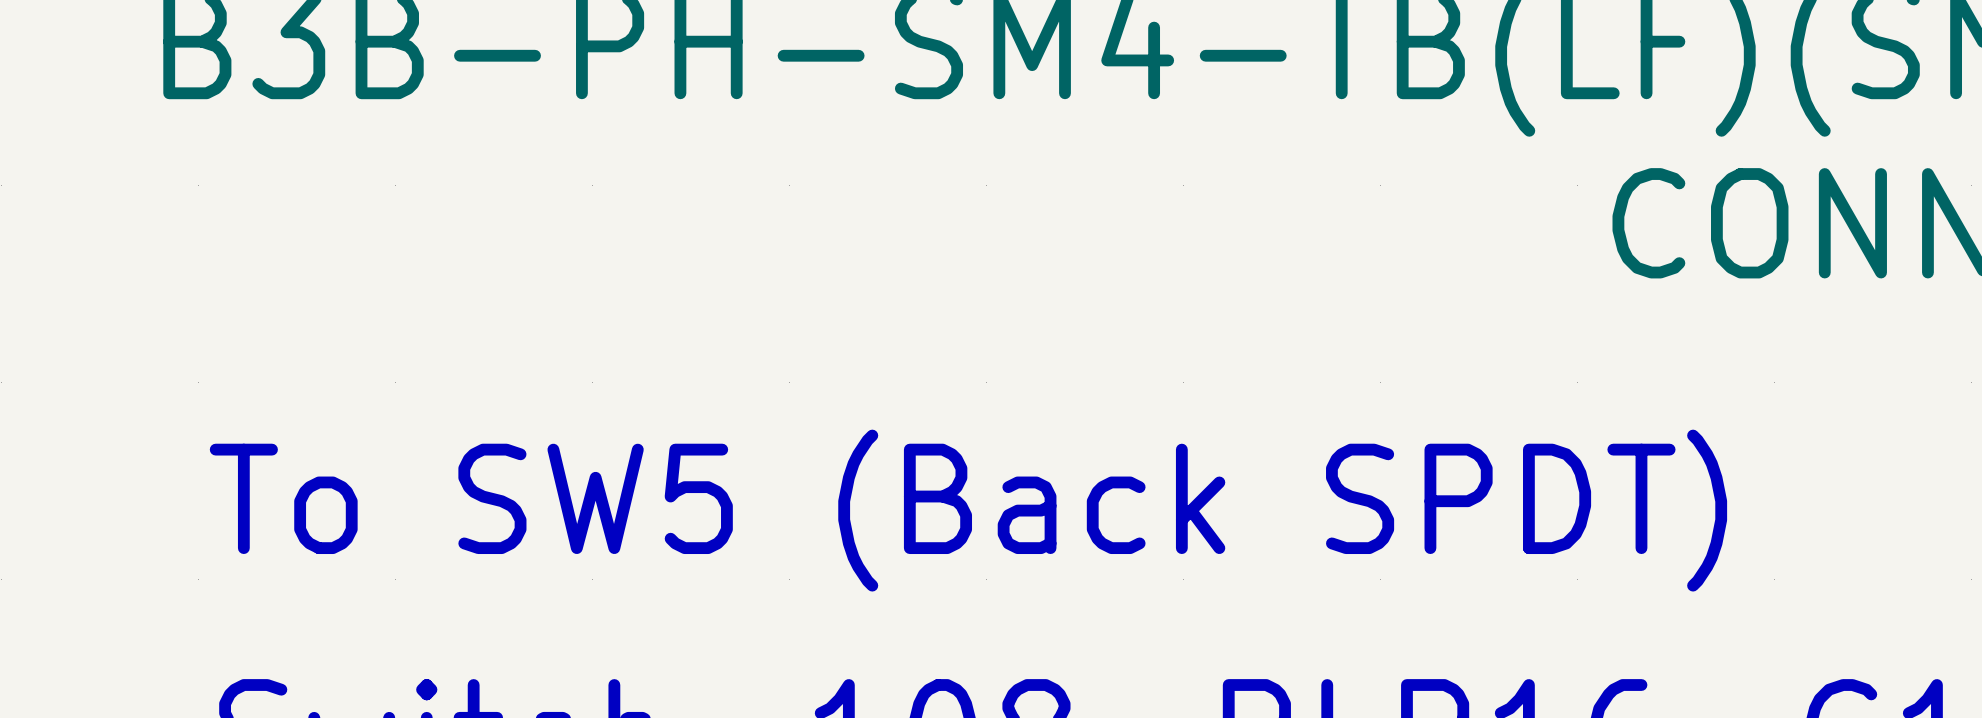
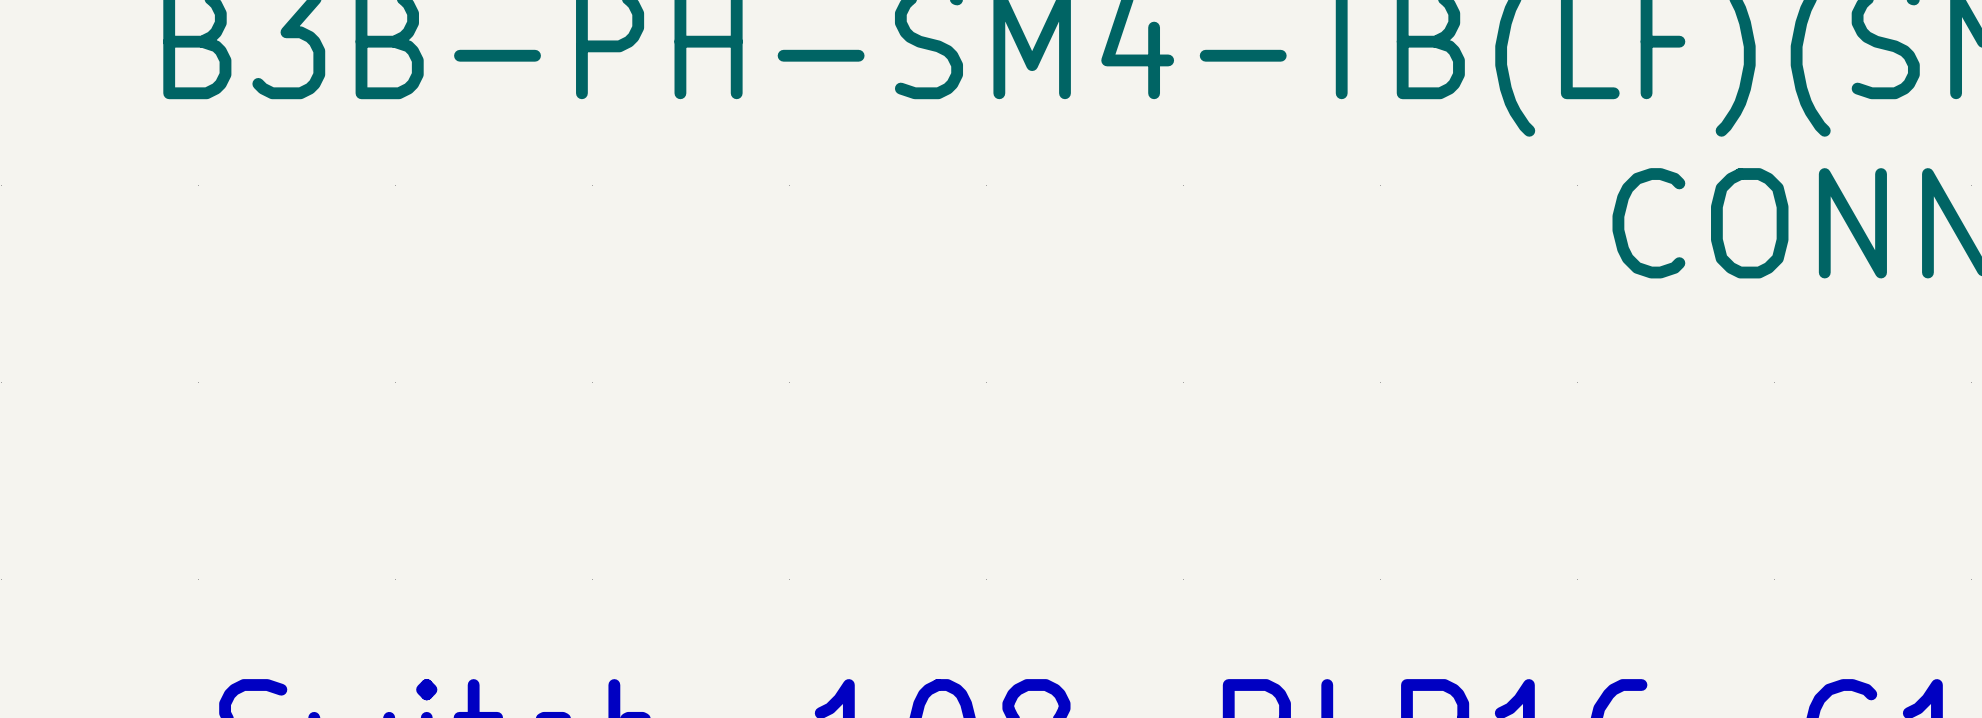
text: To SW5 (Back SPDT) (968, 510) -> none

